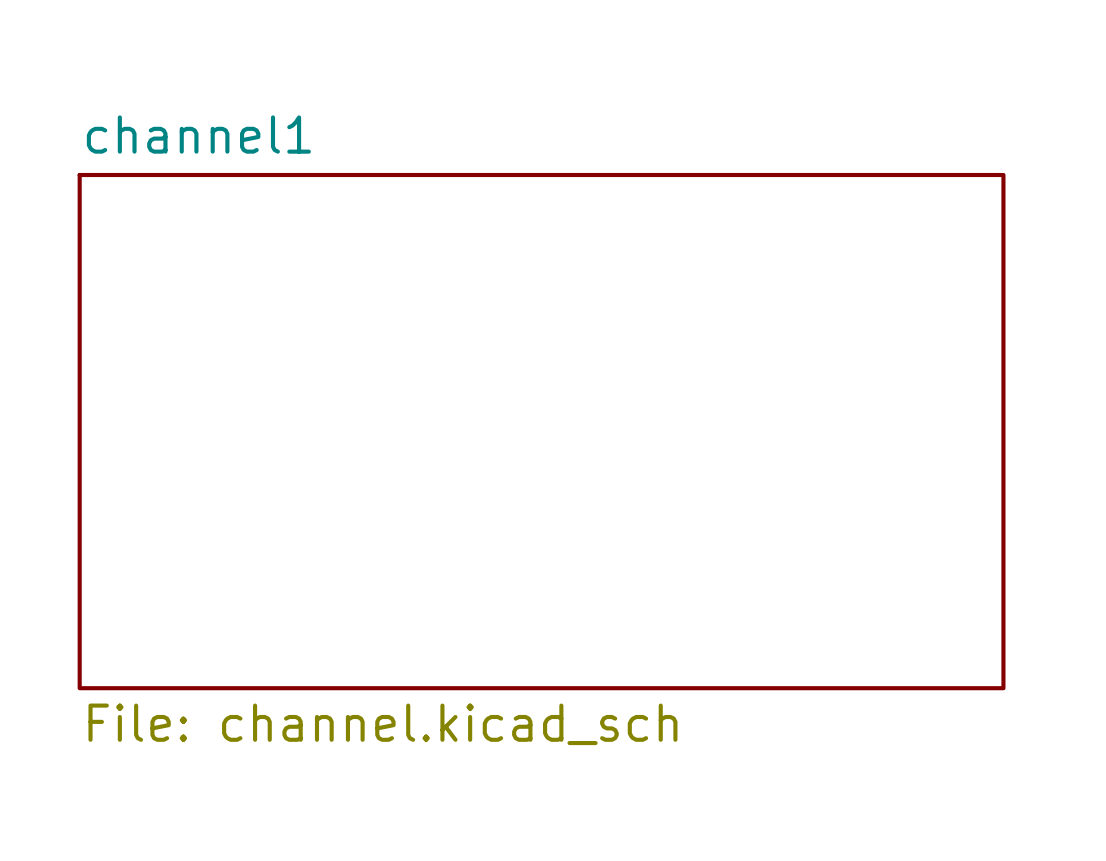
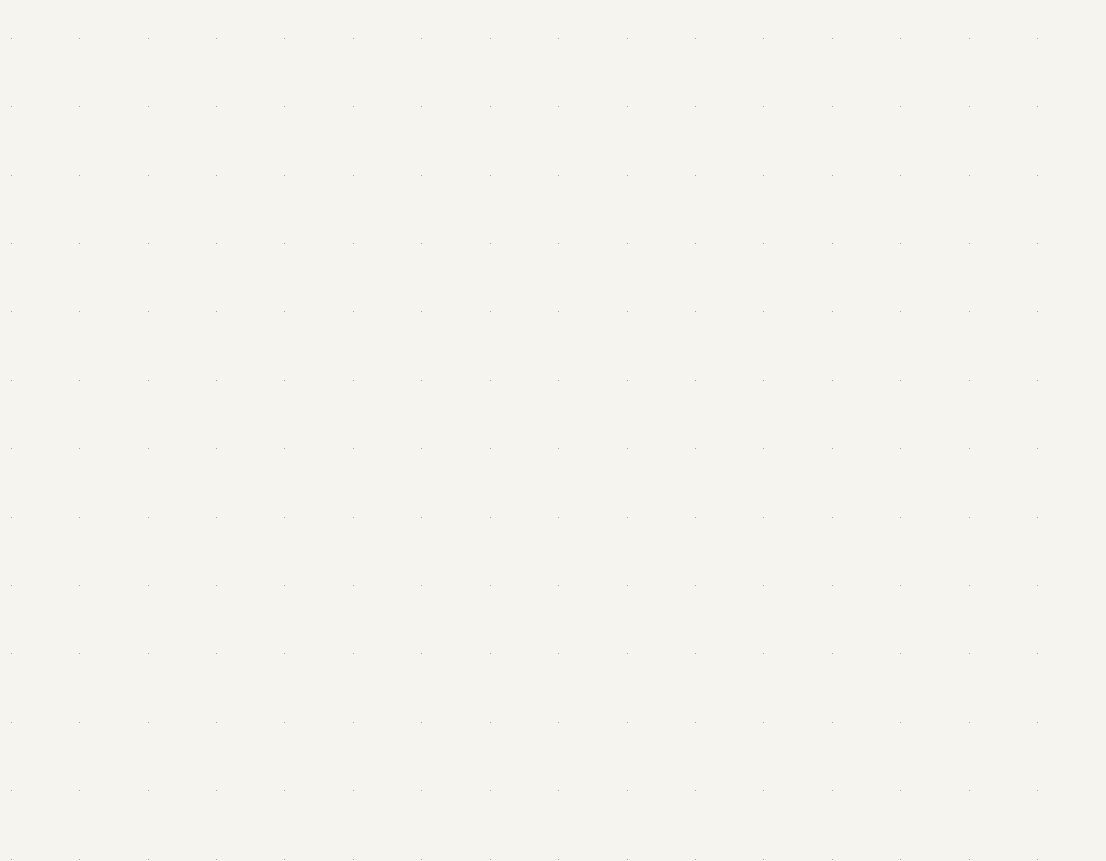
sheet channel1: File: channel.kicad_sch (541, 431) -> none

